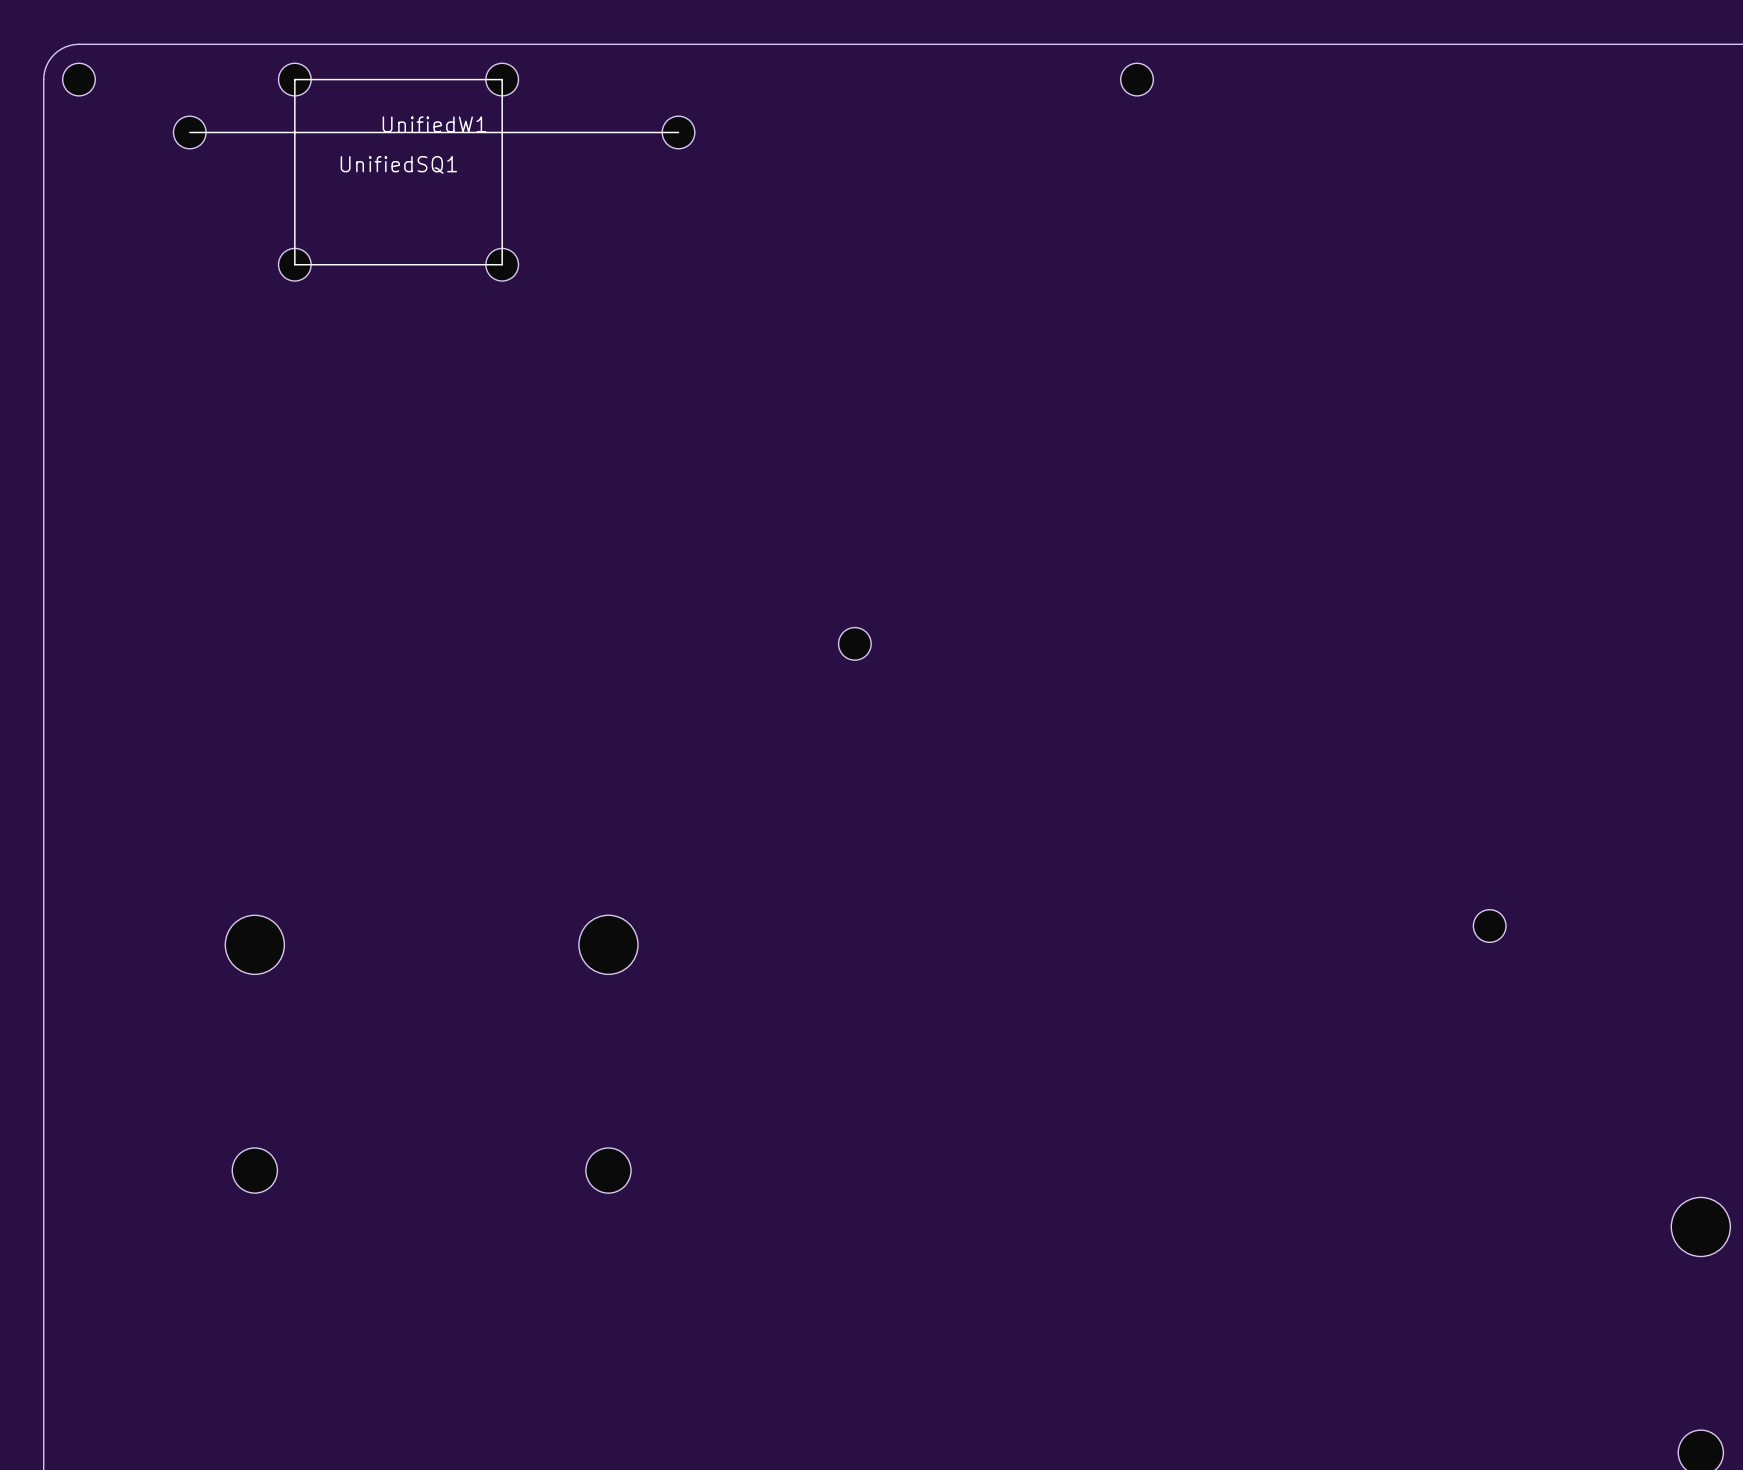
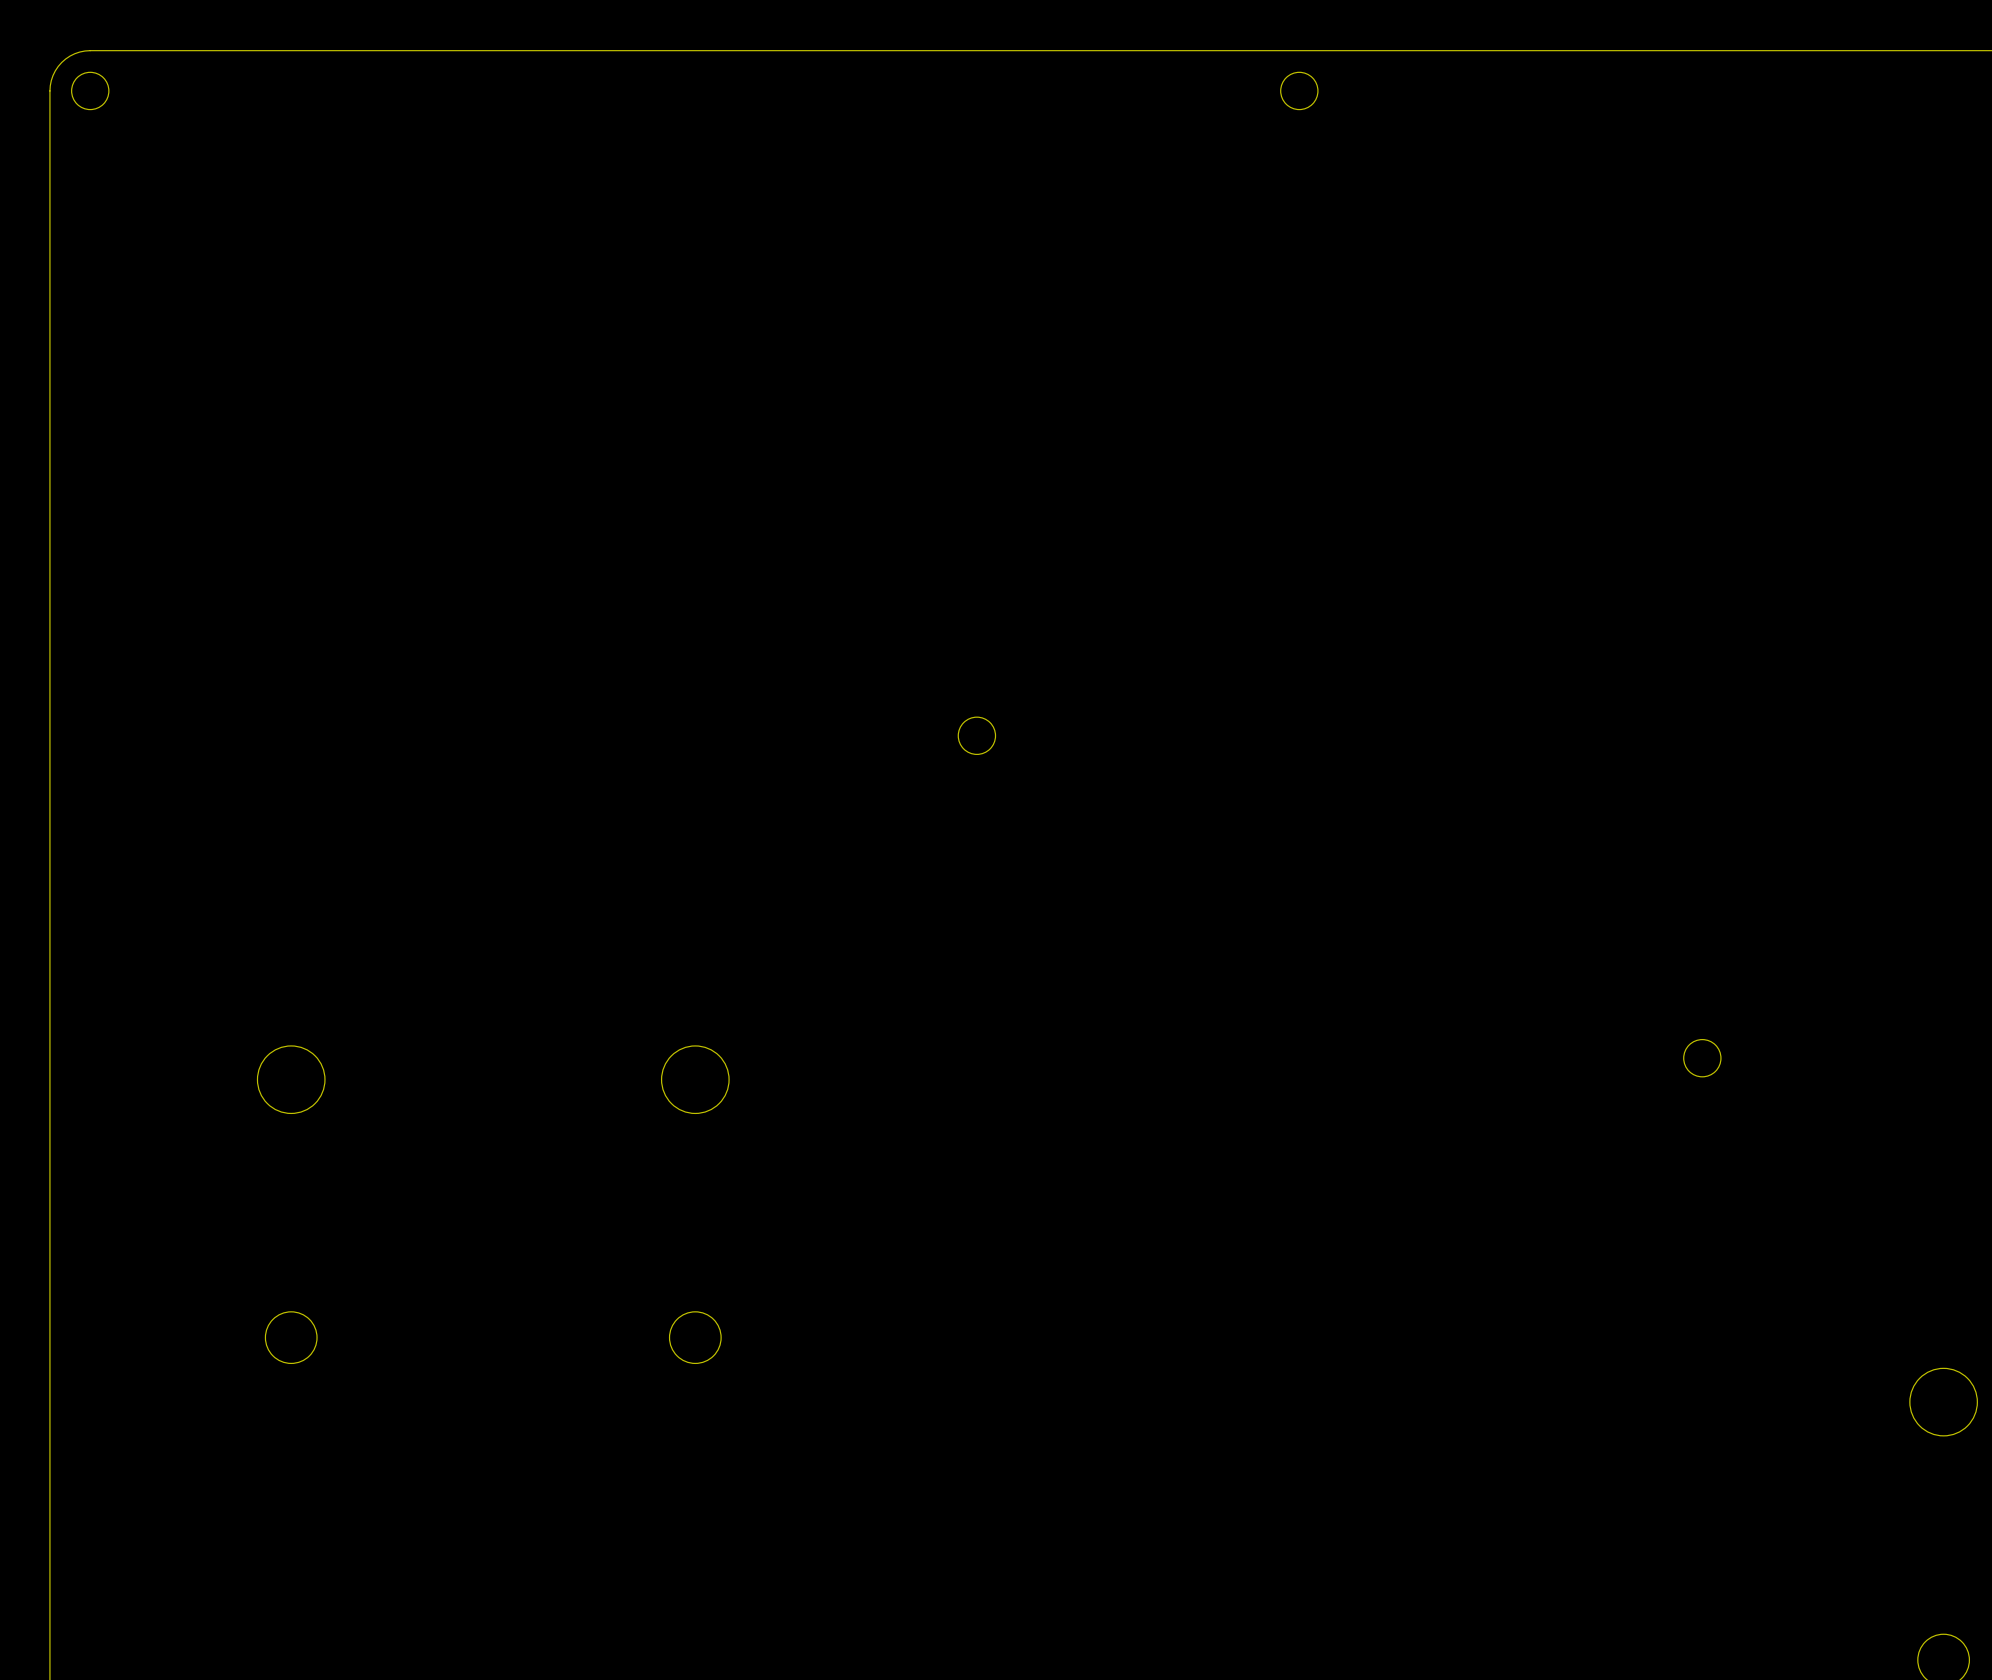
UnifiedW1: (434, 132) -> none
UnifiedSQ1: (398, 172) -> none

